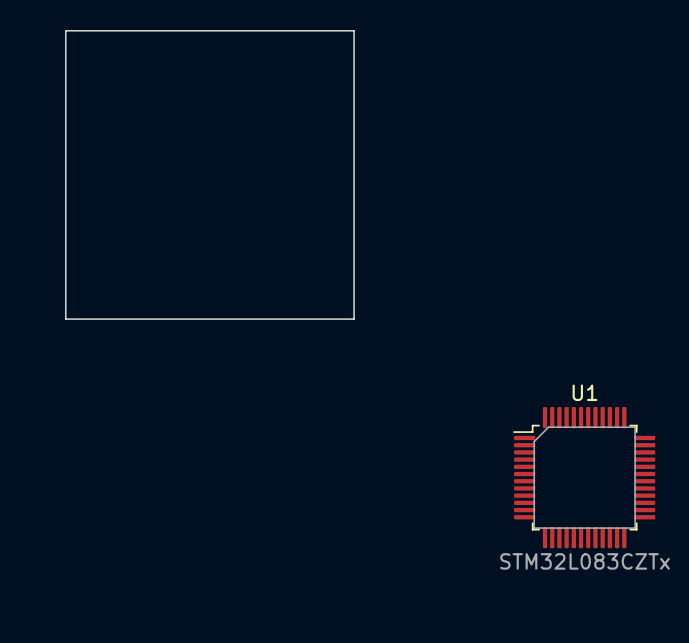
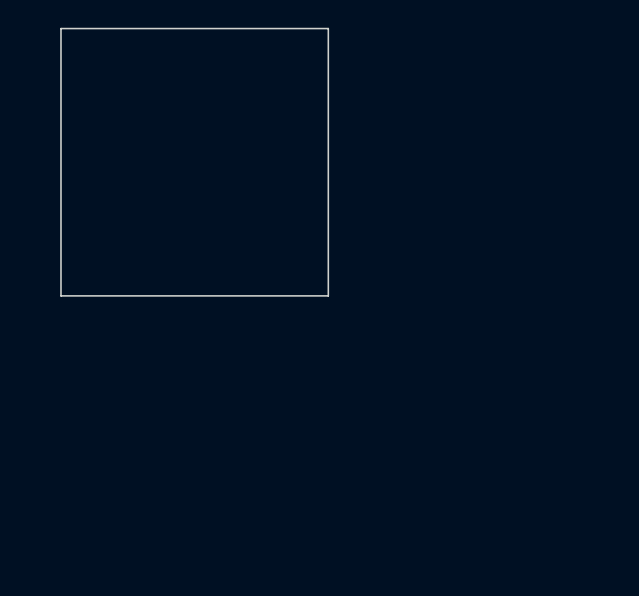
U1: STM32L083CZTx (584, 477) -> none

